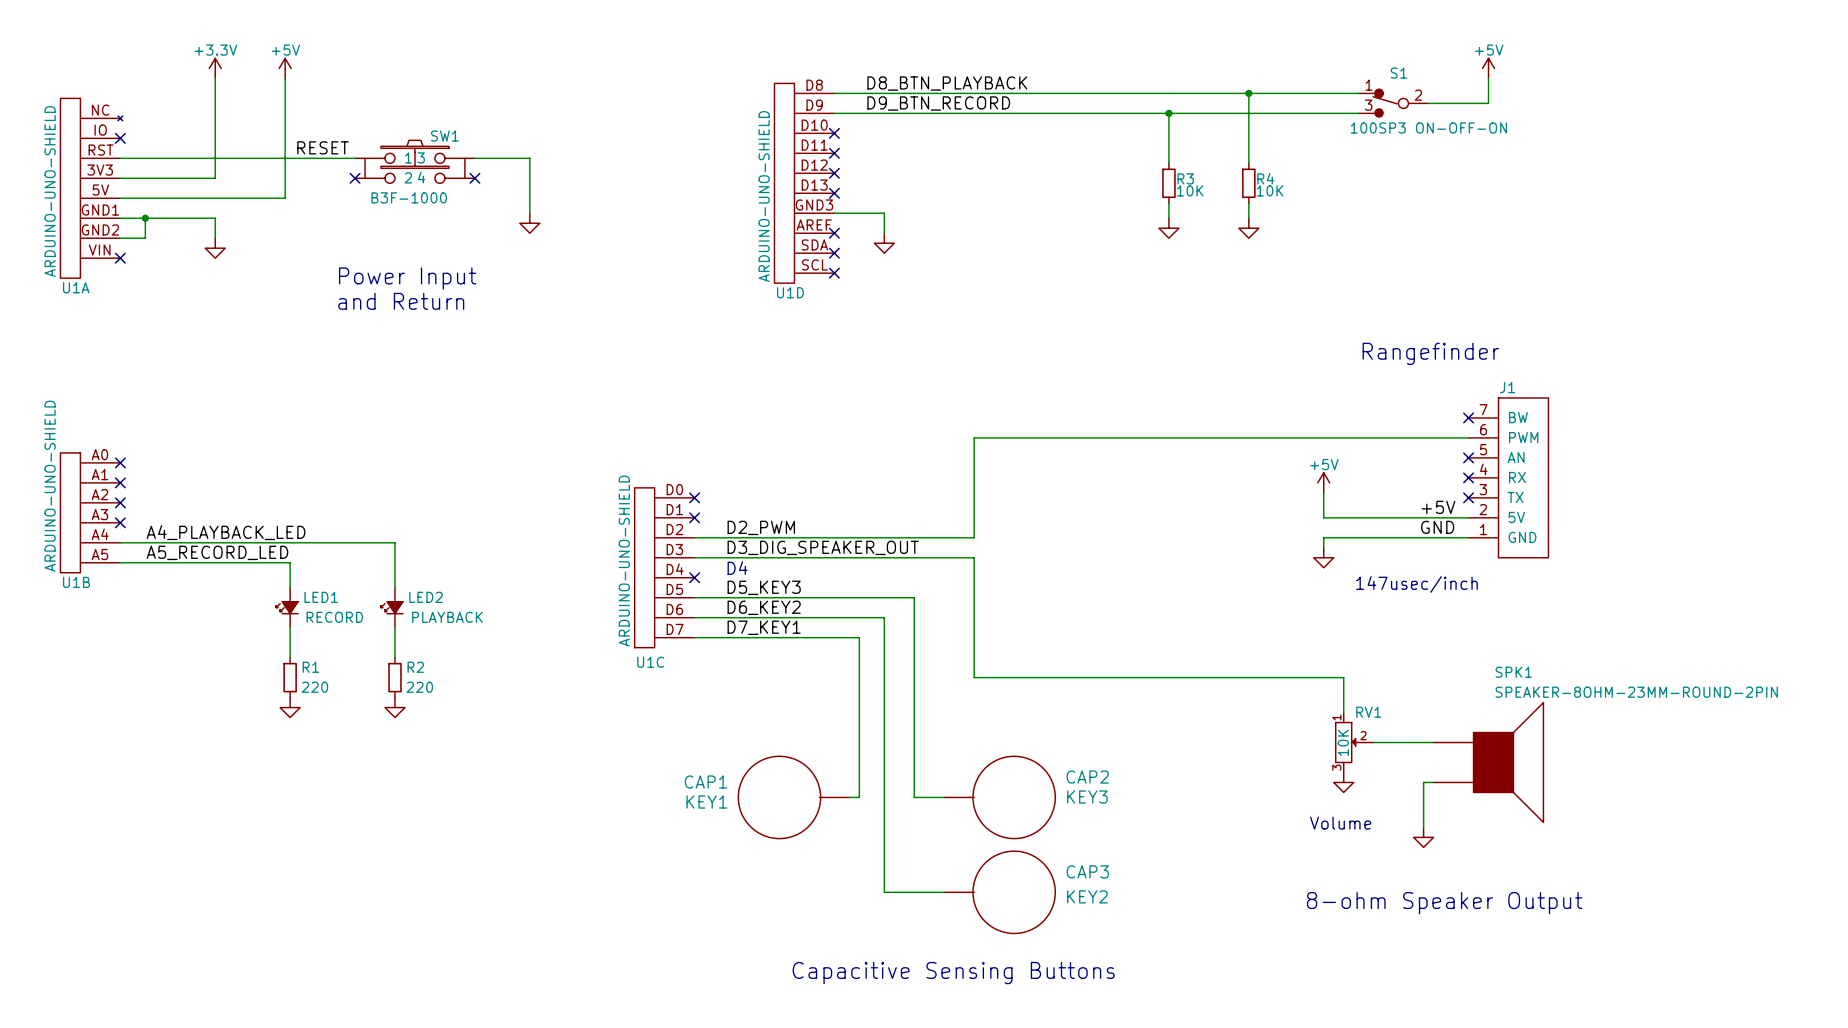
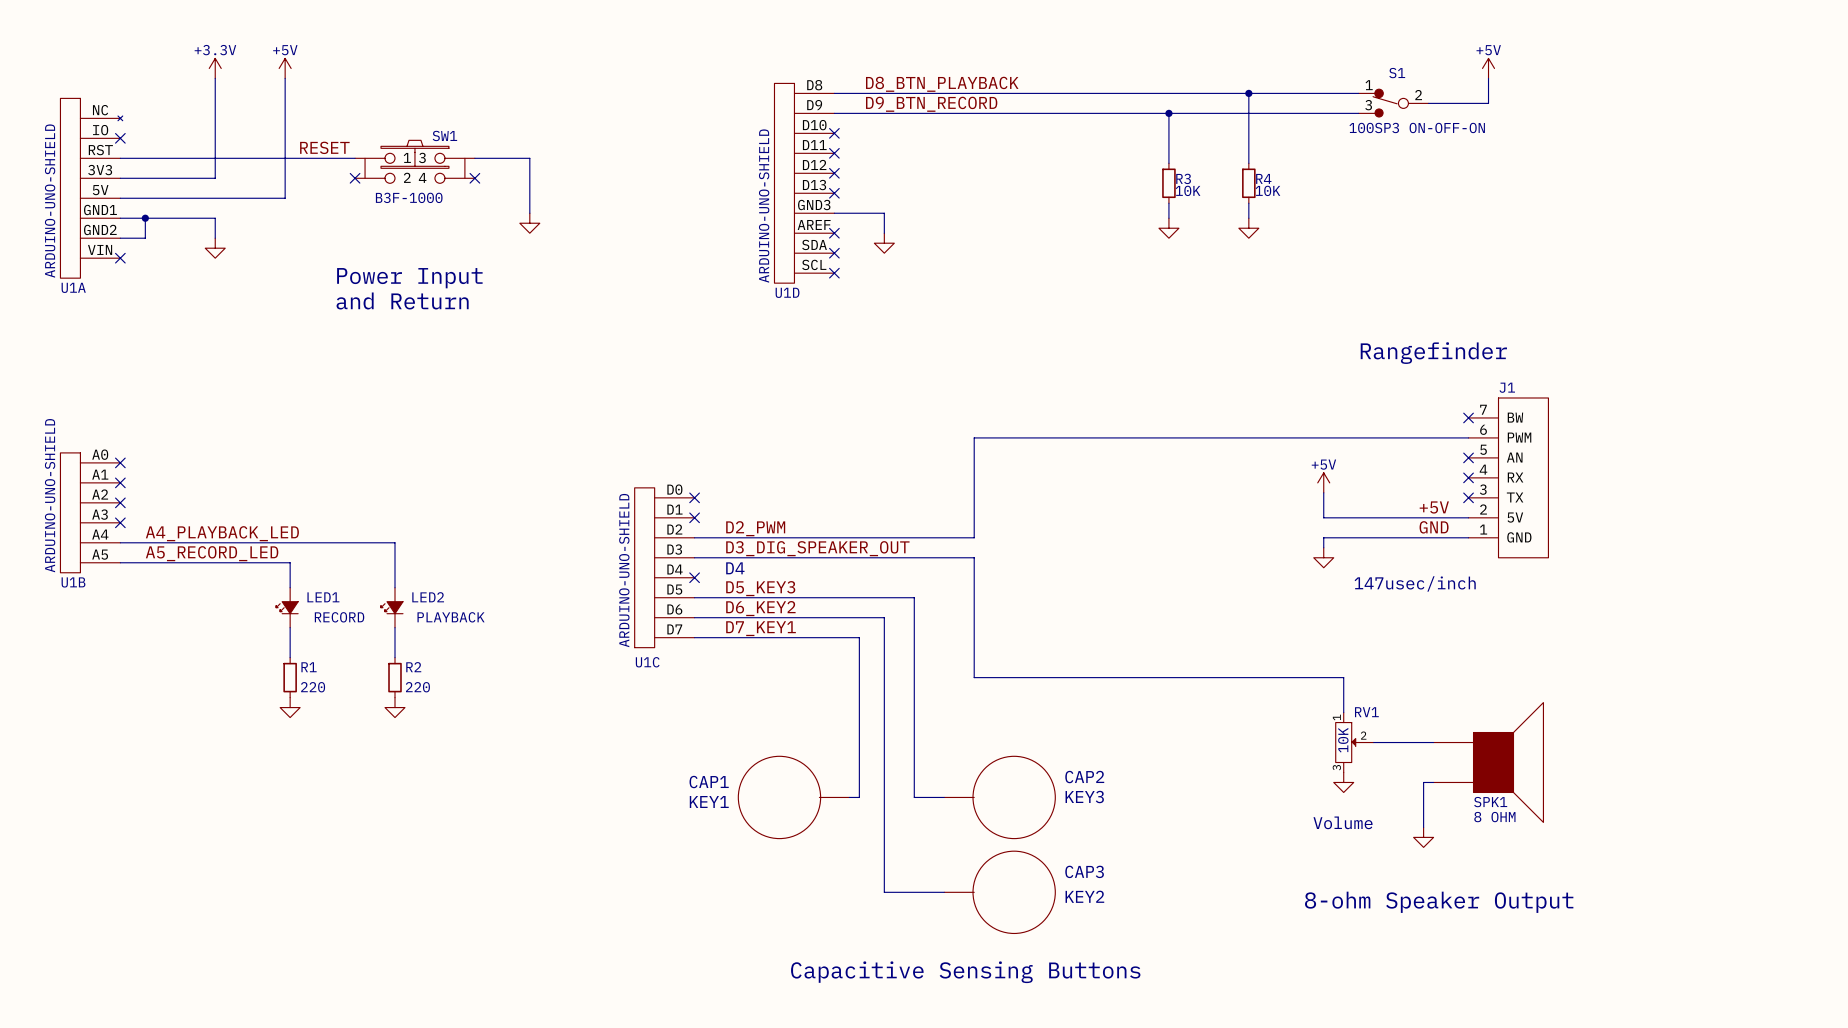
SPK1 name position: SPK1 (1513, 672) -> SPK1 (1490, 802)
SPK1 value: SPEAKER-8OHM-23MM-ROUND-2PIN (1636, 692) -> 8 OHM (1494, 817)

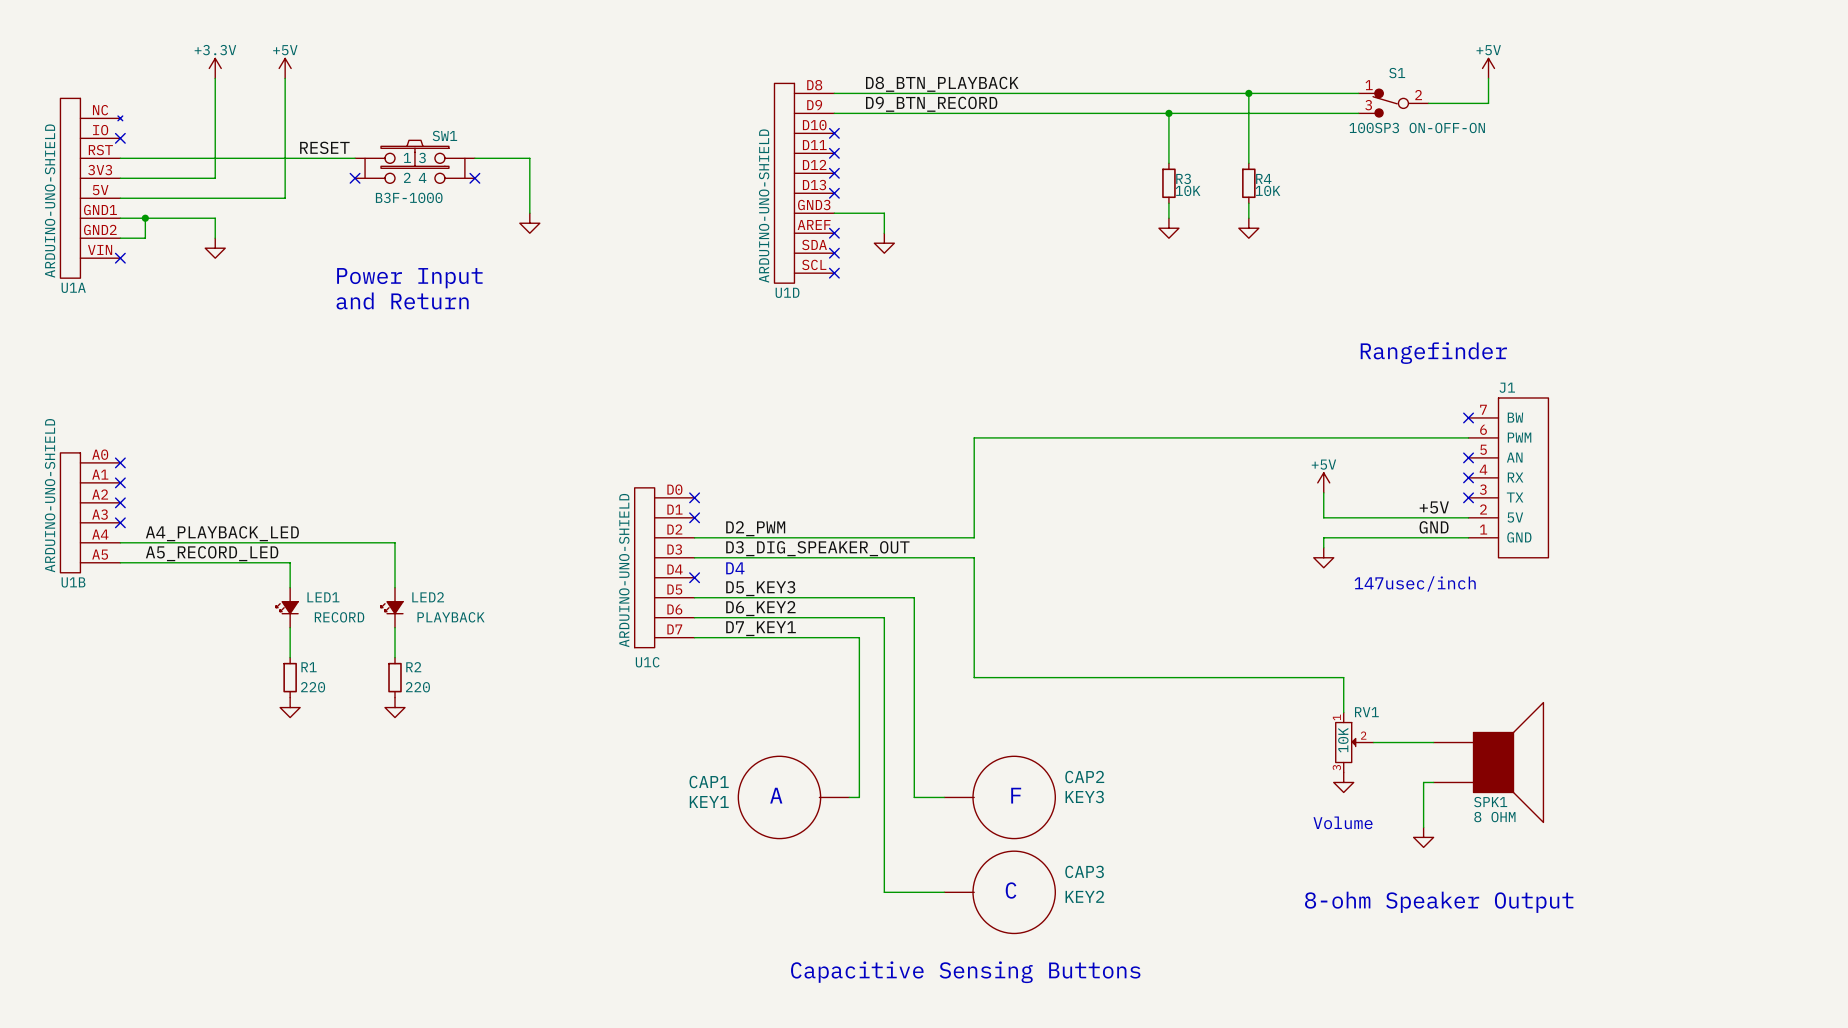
text: none -> A (776, 795)
text: none -> F (1016, 795)
text: none -> C (1011, 890)

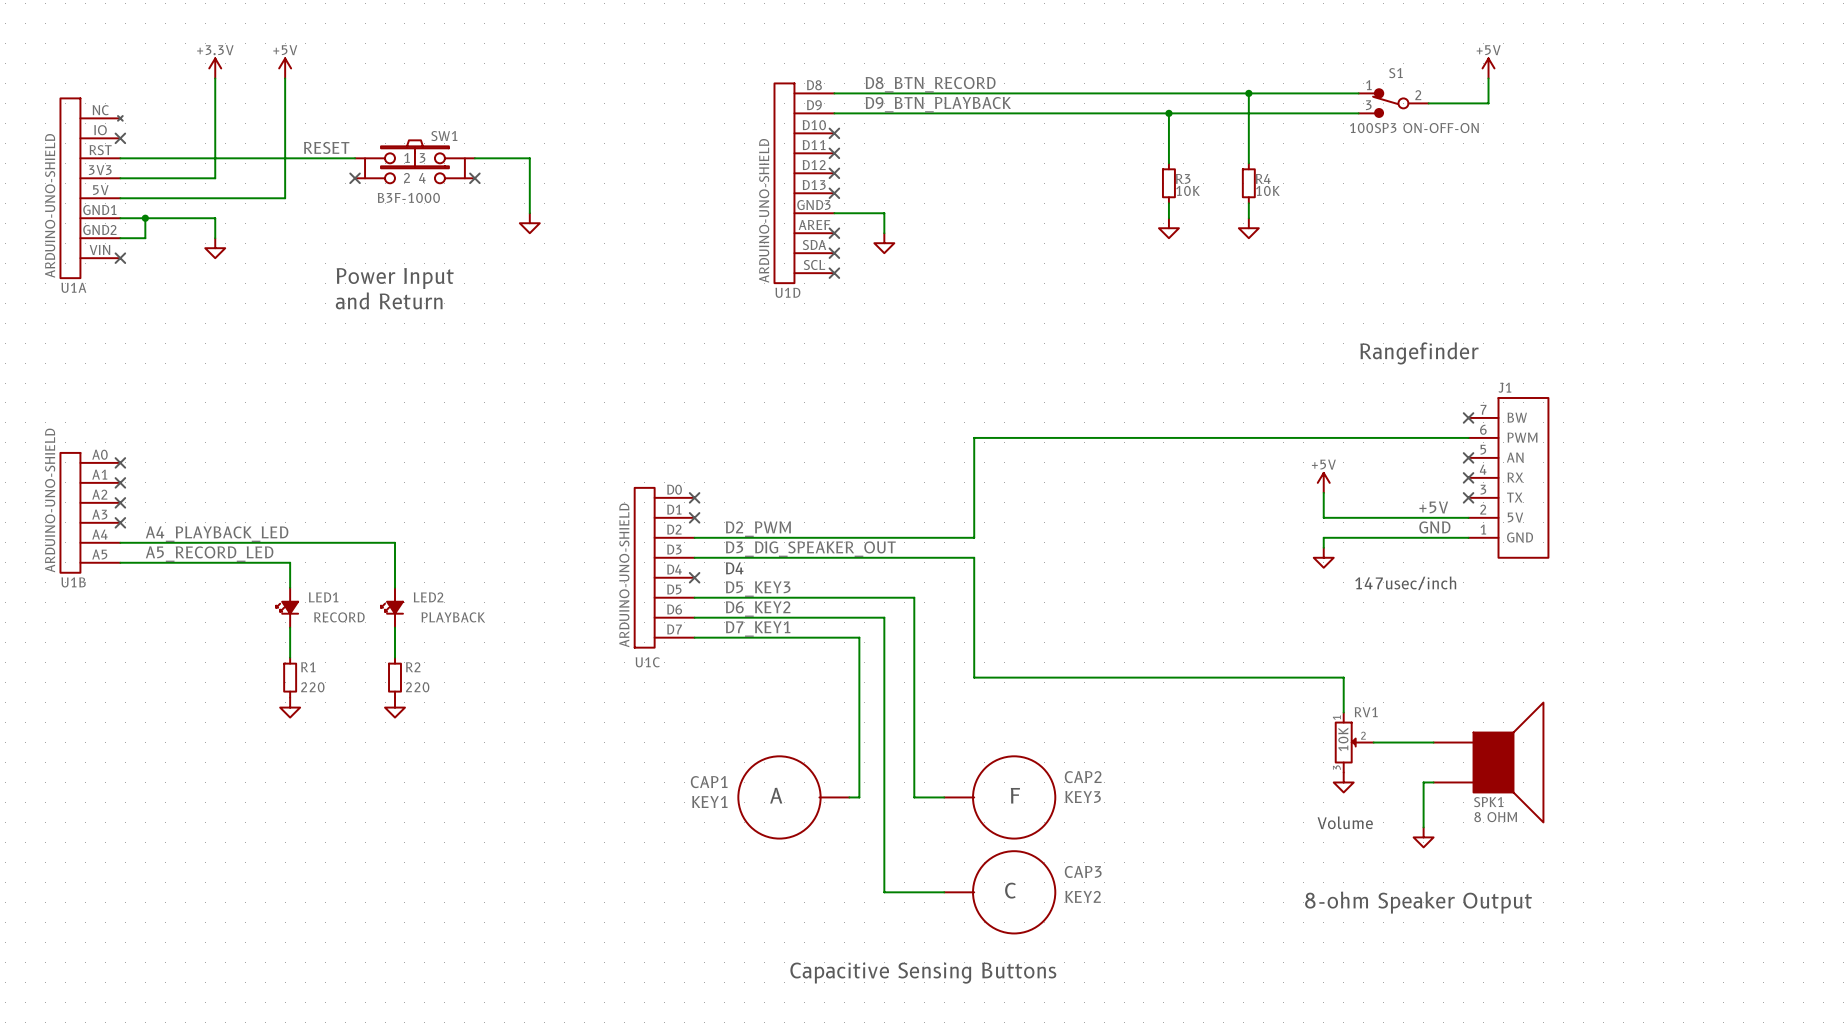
label: D8_BTN_PLAYBACK (942, 84) -> D8_BTN_RECORD (930, 84)
label: D9_BTN_RECORD (931, 104) -> D9_BTN_PLAYBACK (938, 104)

